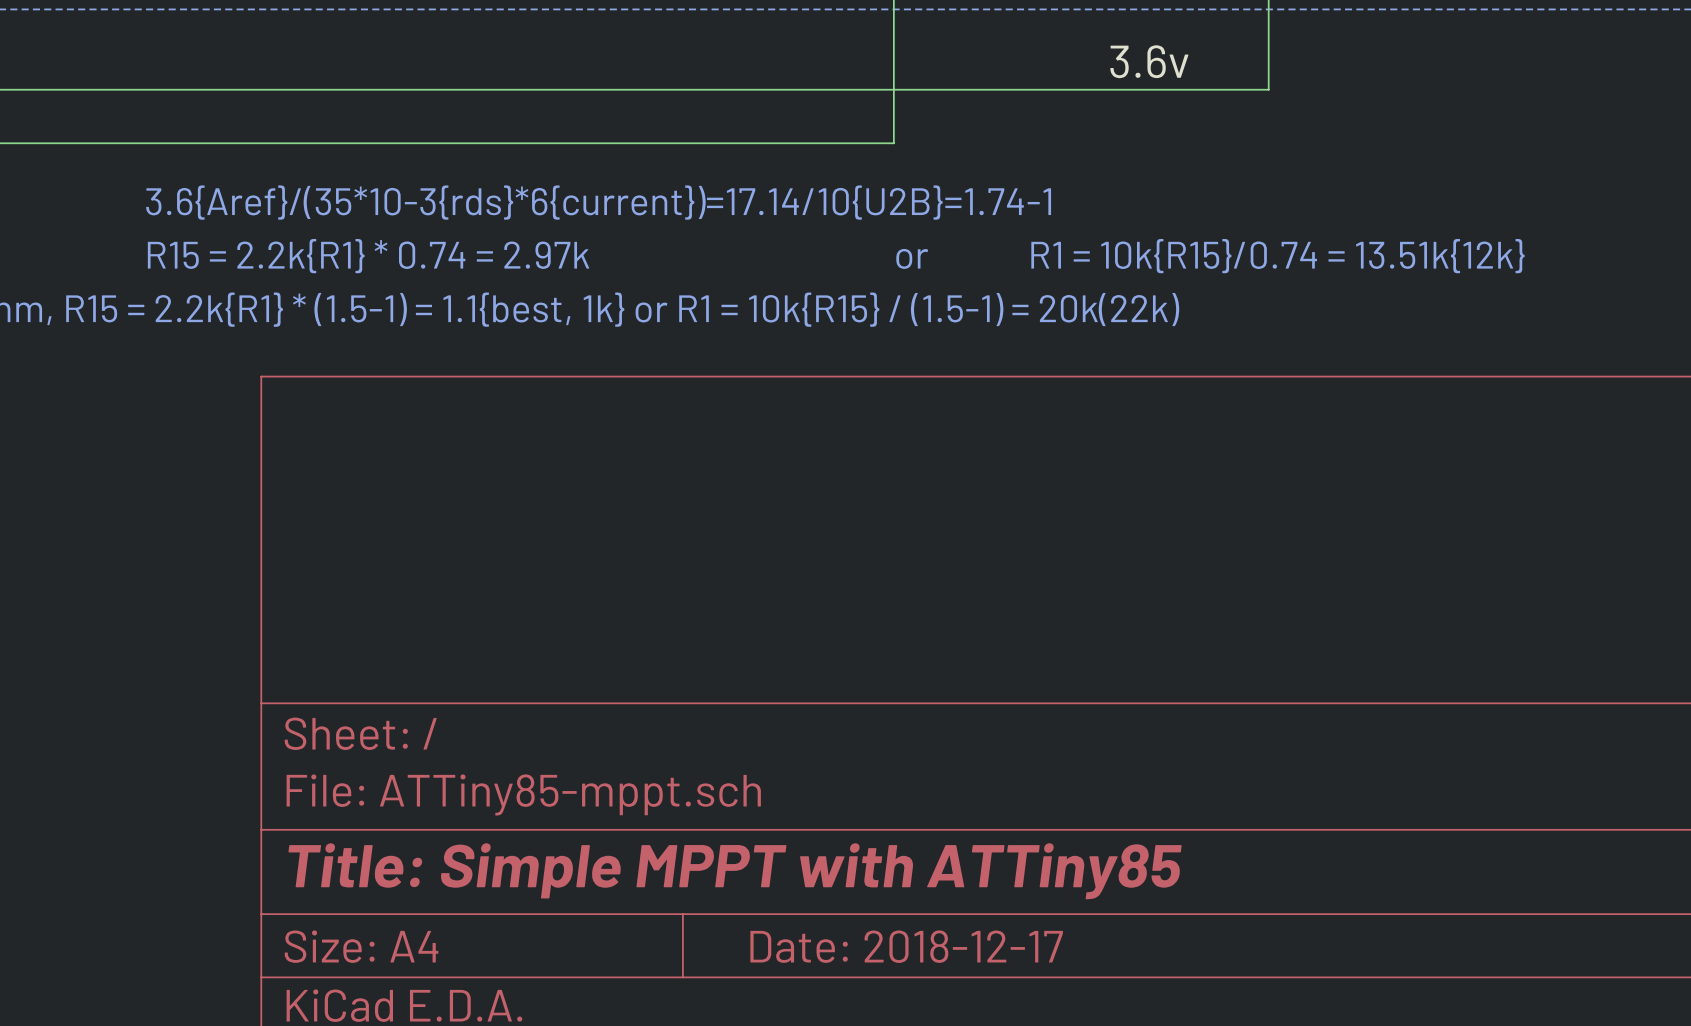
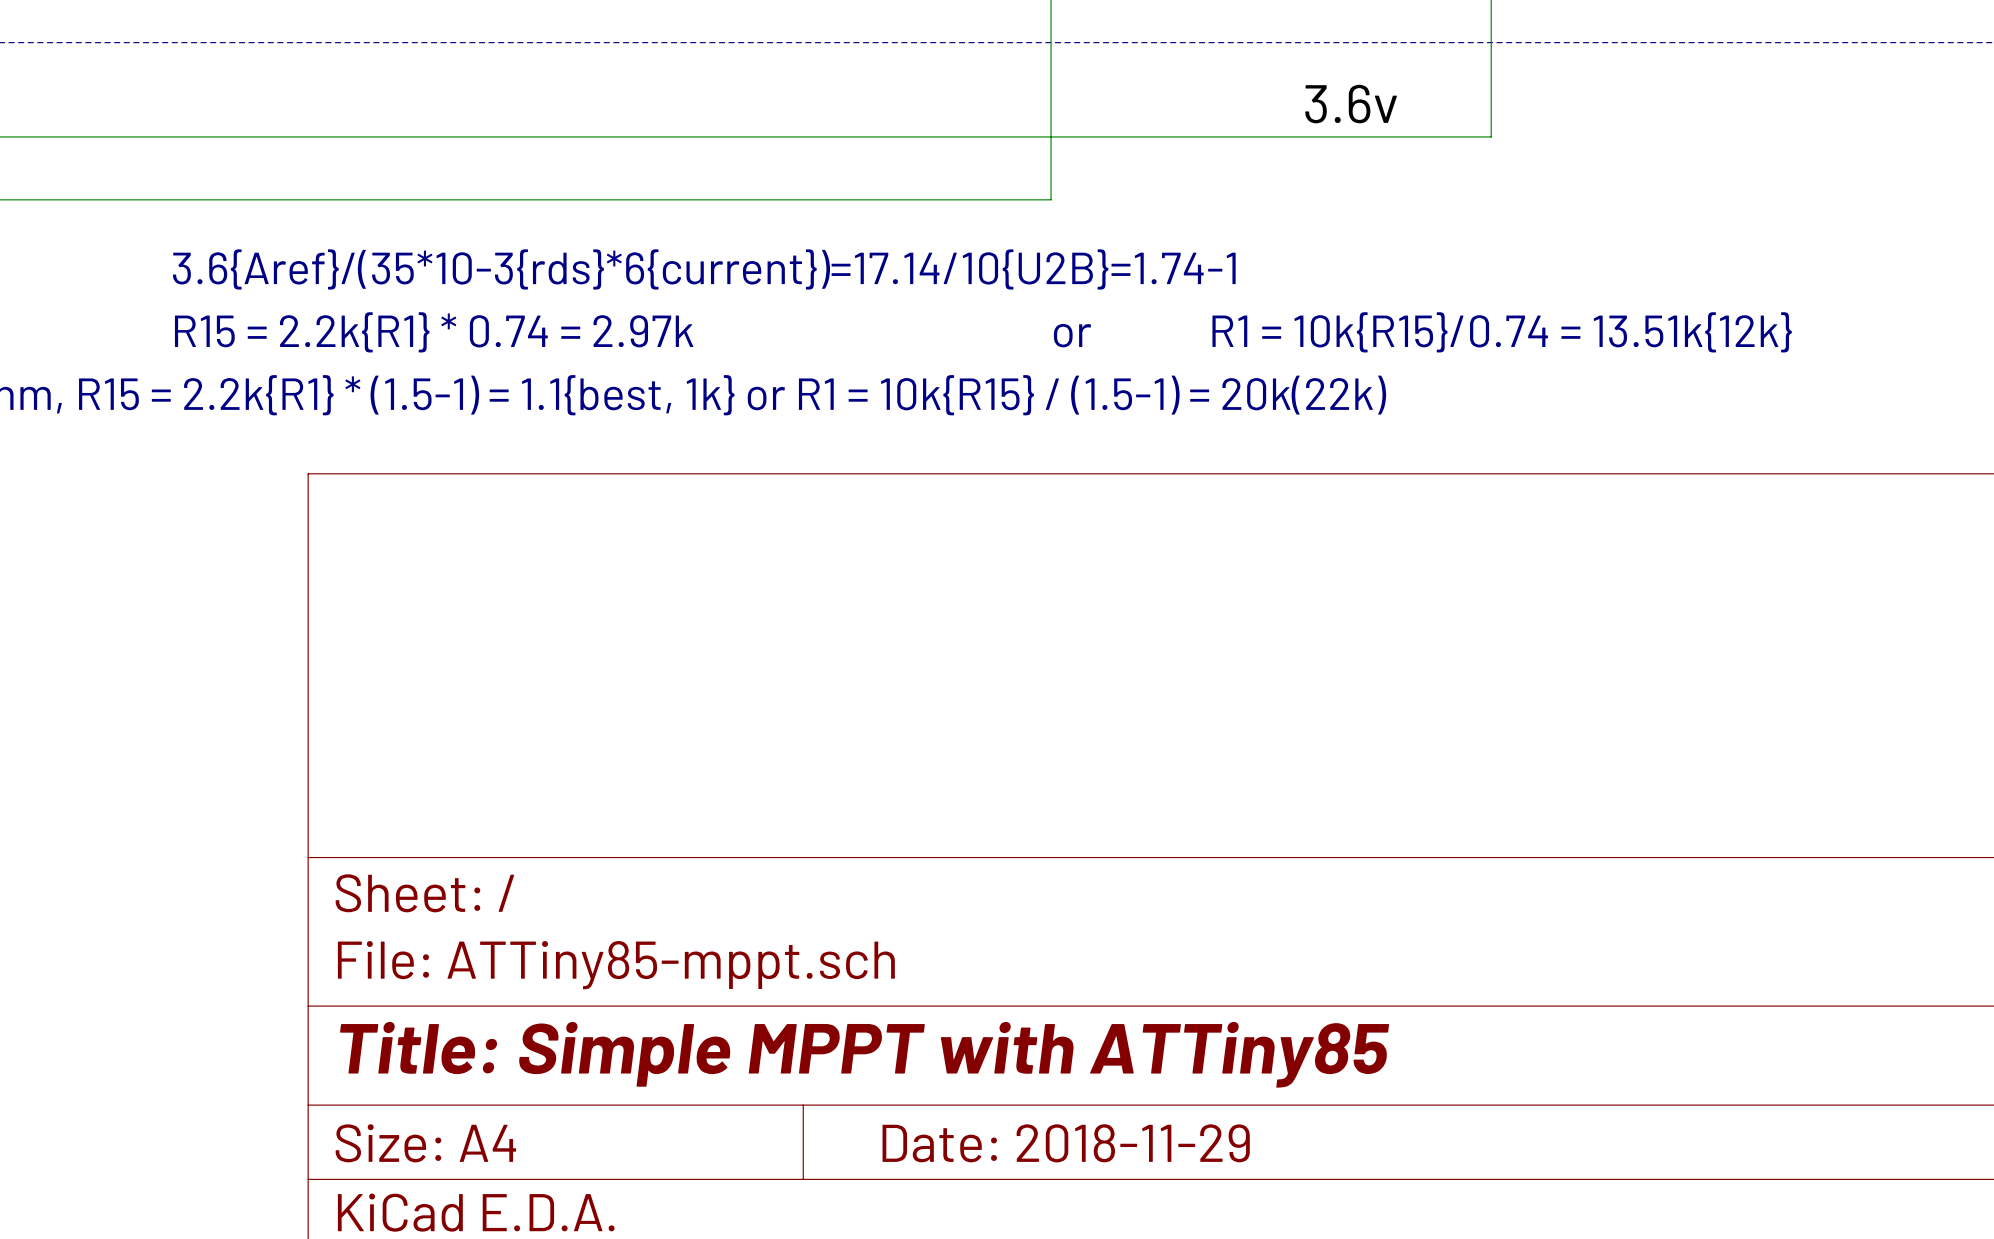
title block: Date: 2018-12-17 (906, 946) -> Date: 2018-11-29 (1066, 1143)

